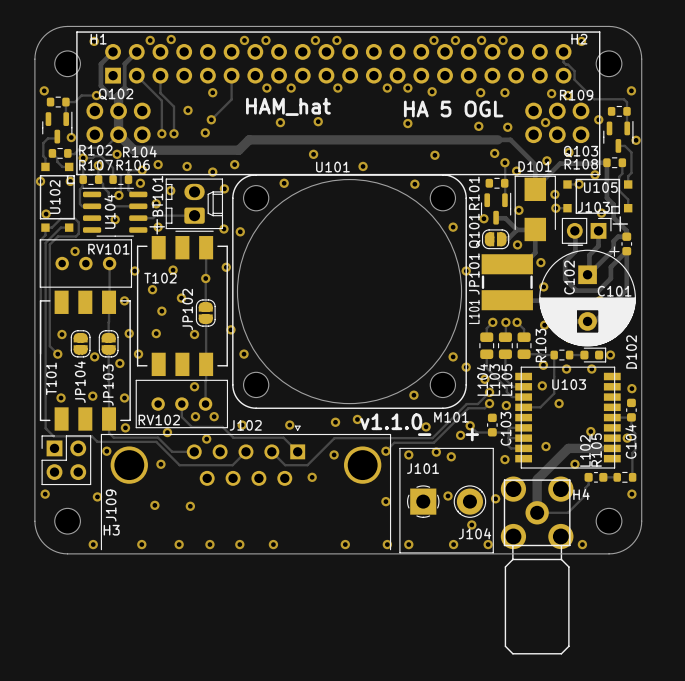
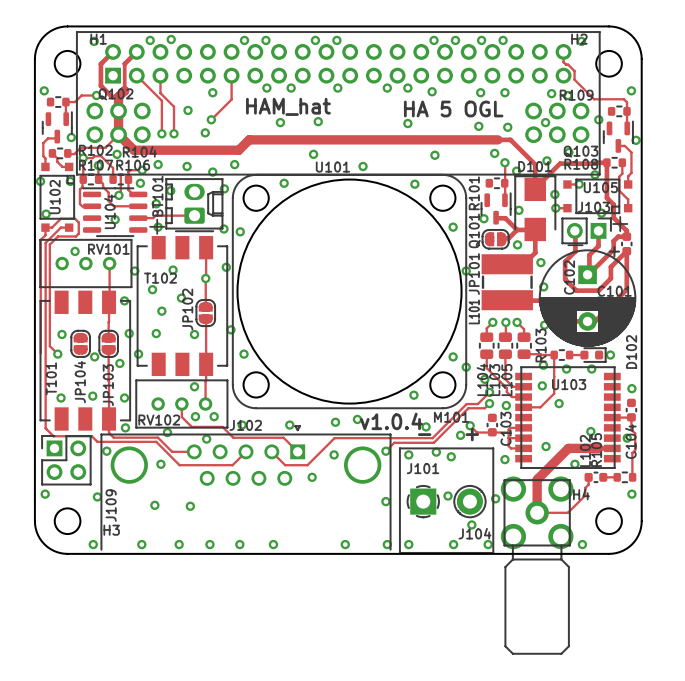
text: v1.1.0 (391, 421) -> v1.0.4 (391, 421)

